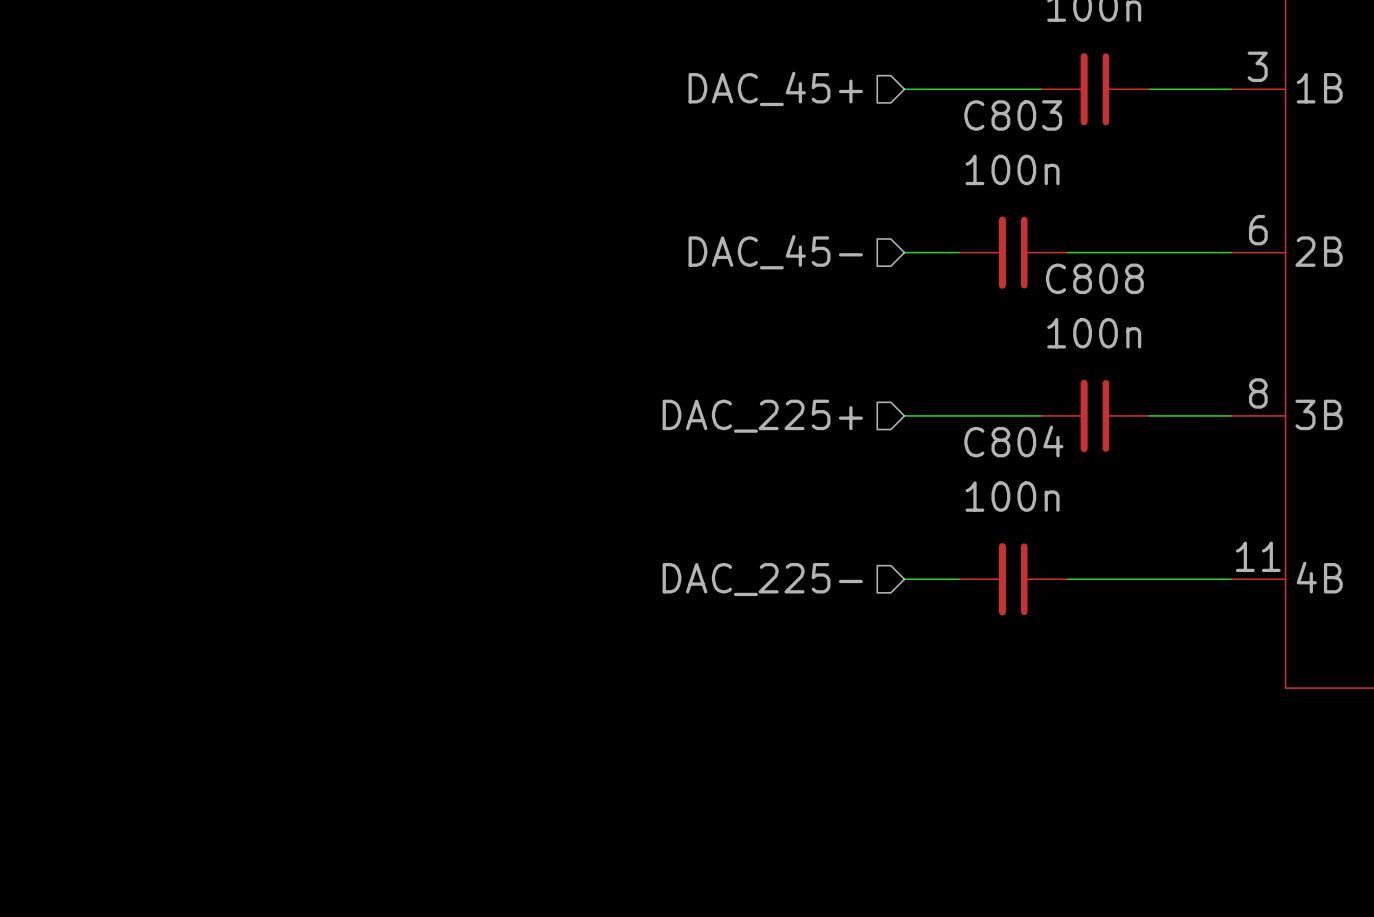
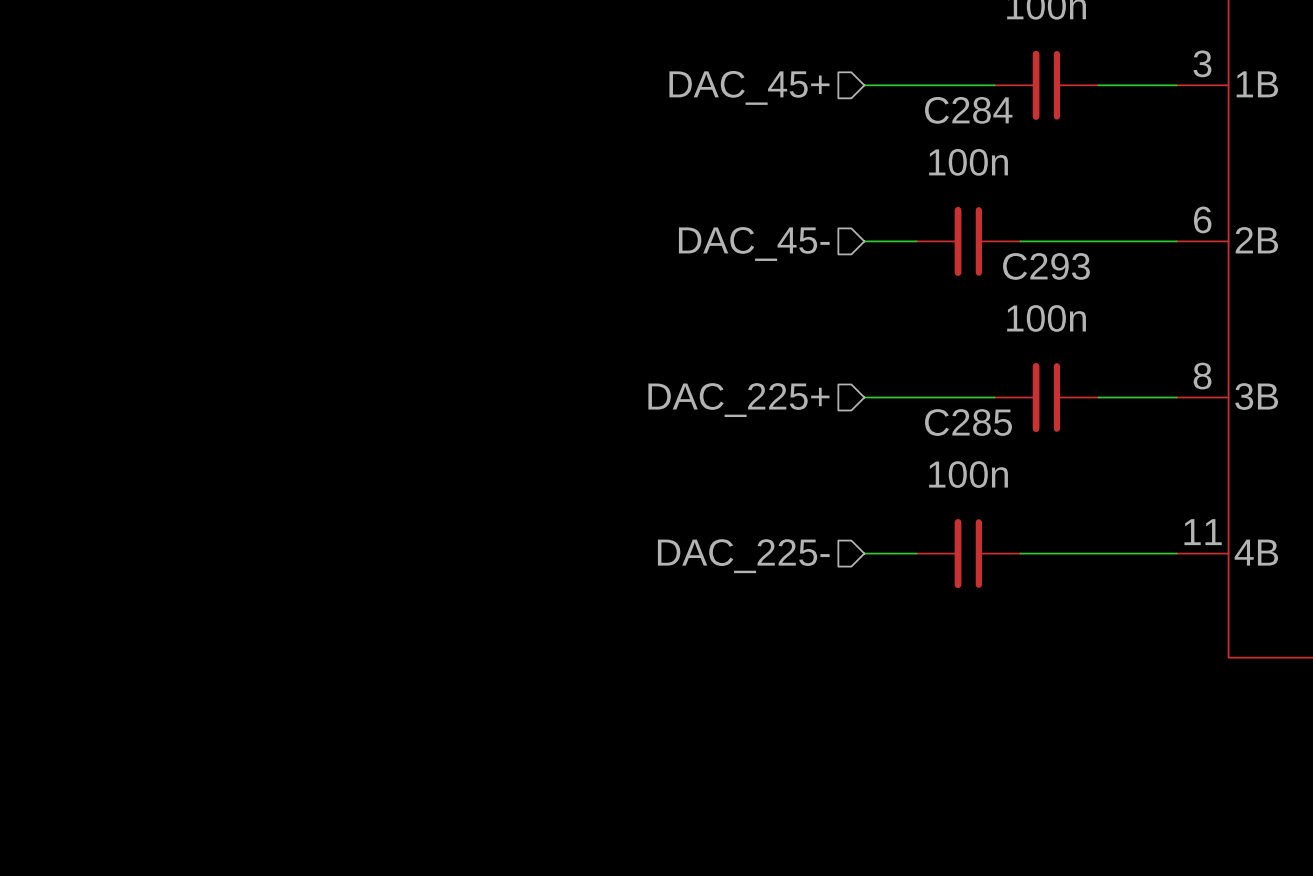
C803 name: C803 (1013, 115) -> C284 (968, 110)
C808 name: C808 (1094, 278) -> C293 (1046, 266)
C804 name: C804 (1013, 441) -> C285 (968, 422)

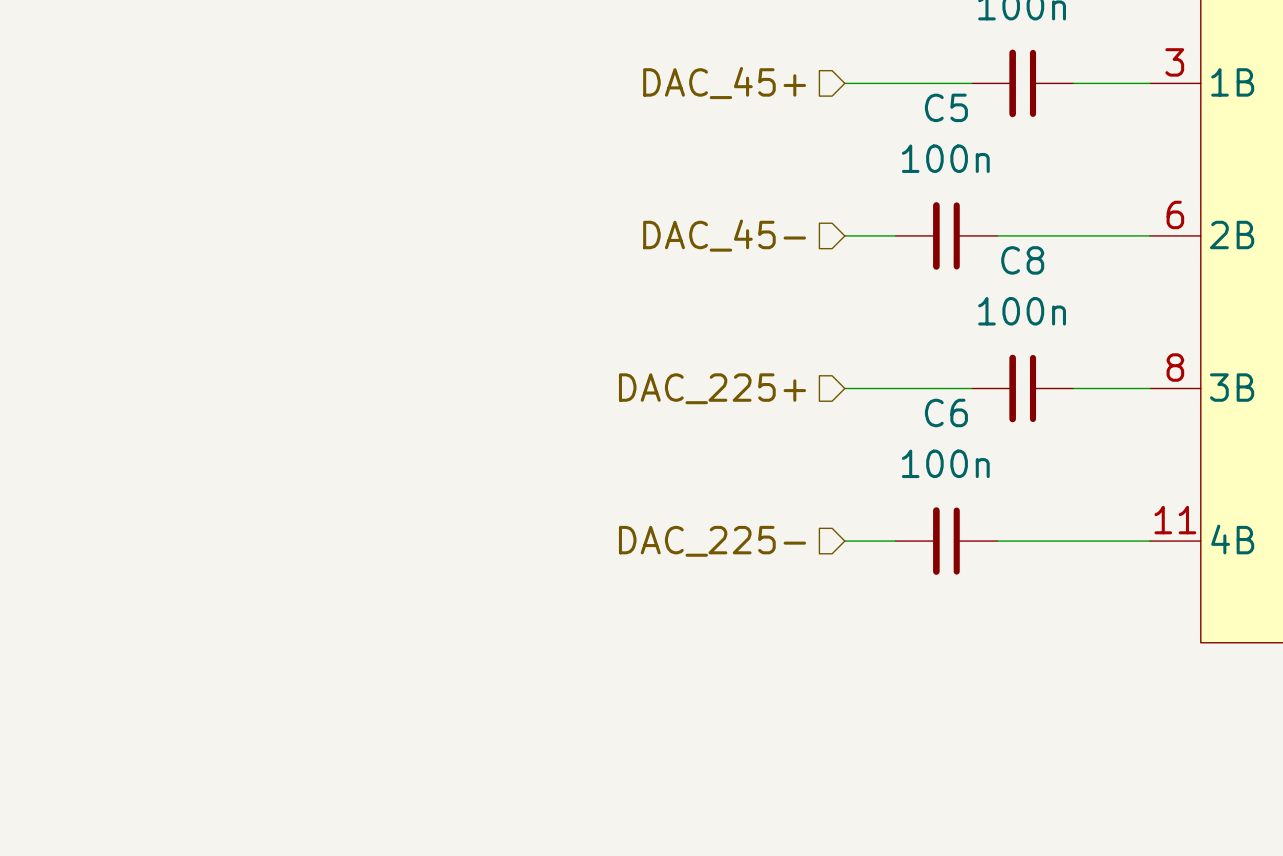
C284 name: C284 (968, 110) -> C5 (946, 107)
C293 name: C293 (1046, 266) -> C8 (1022, 260)
C285 name: C285 (968, 422) -> C6 (946, 412)

